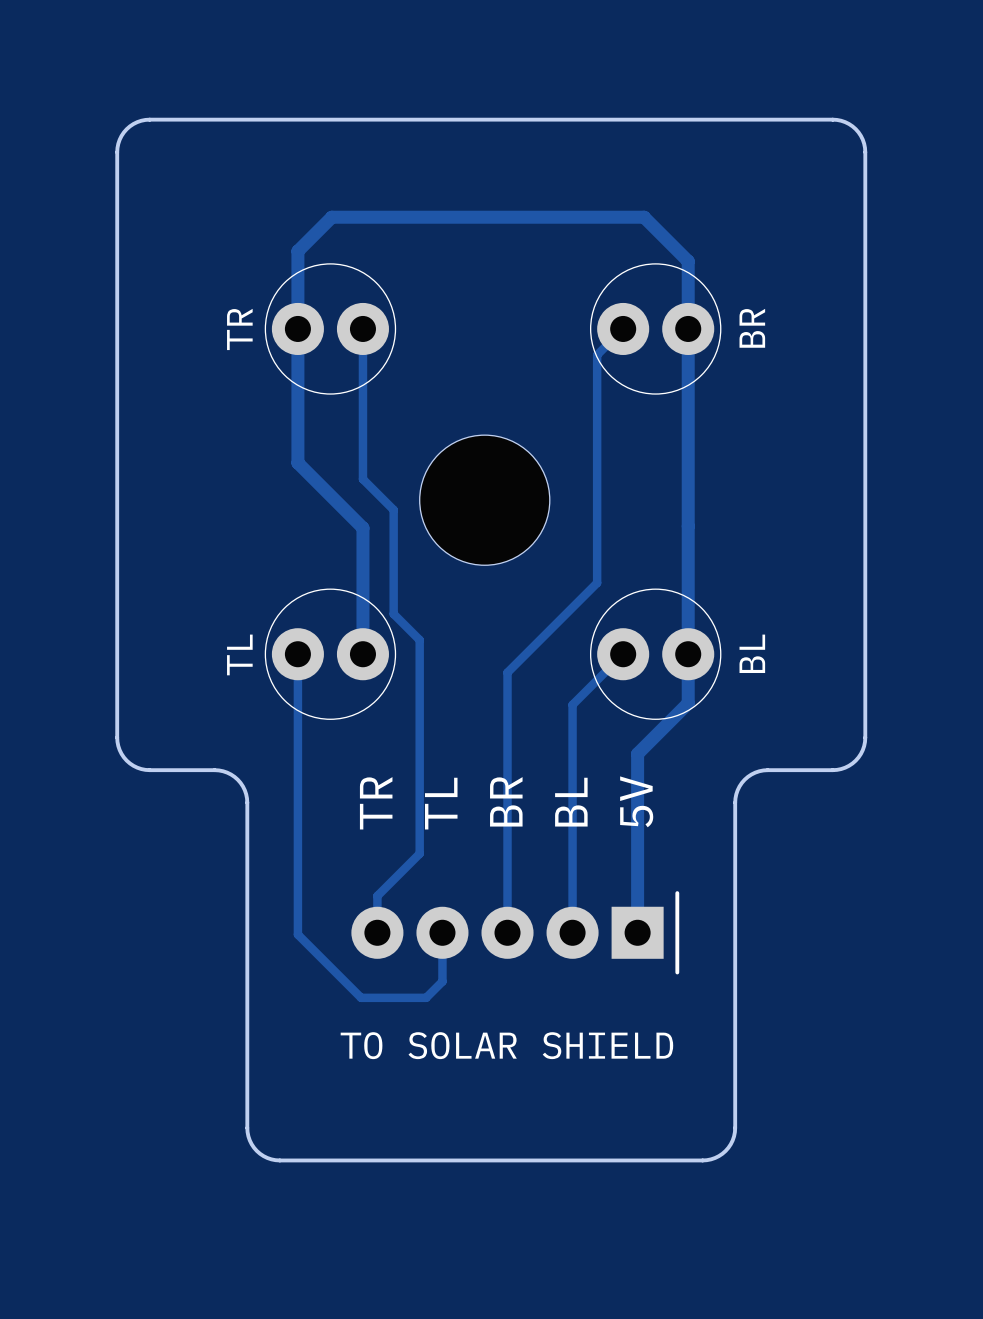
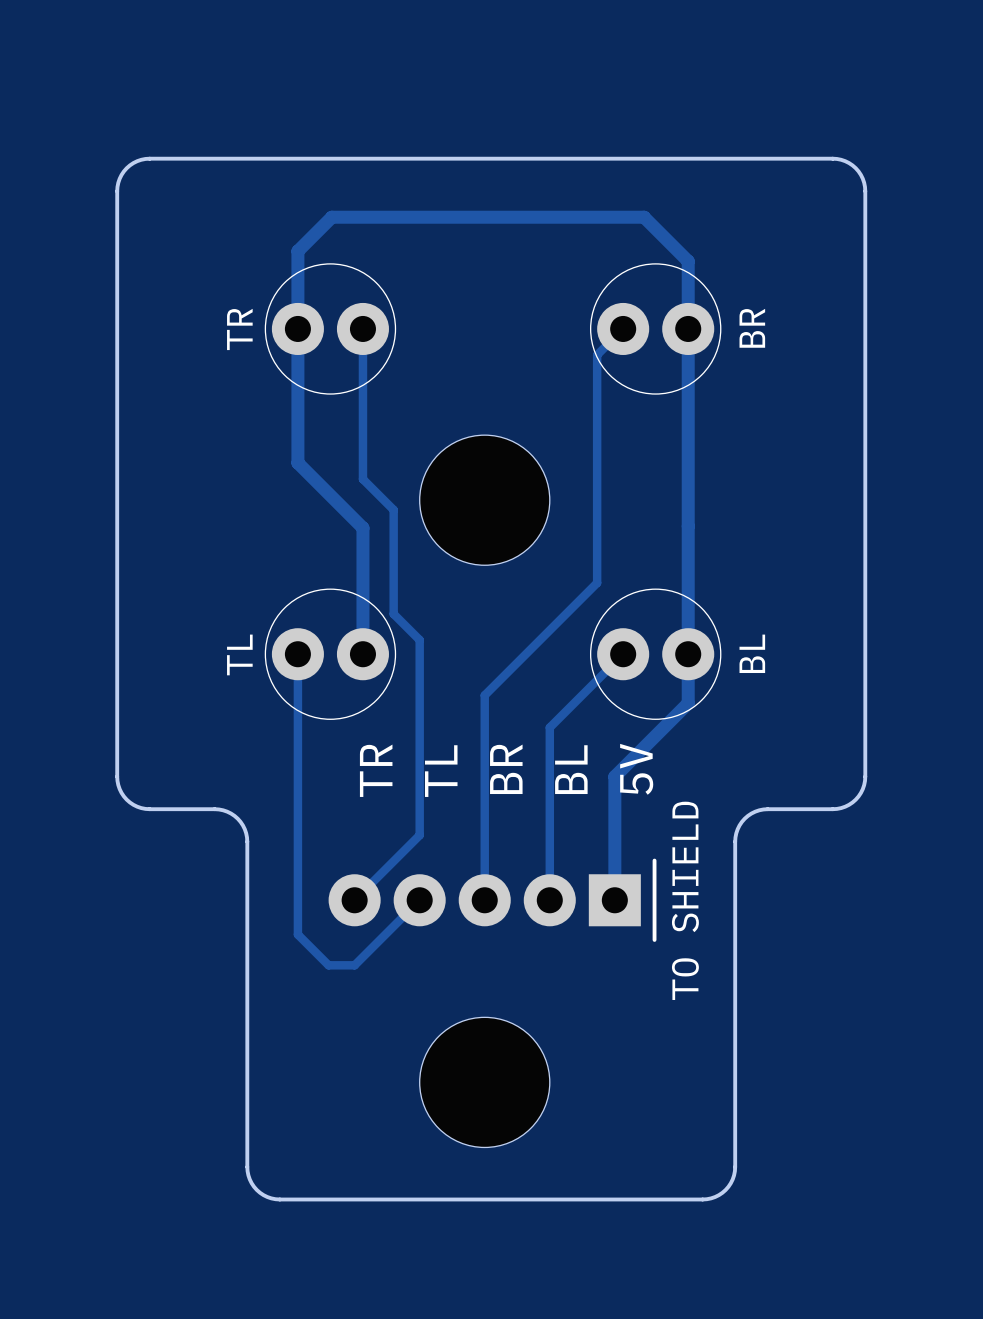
board edge: (117, 191) (117, 152) (119, 139) (129, 126) (141, 120) (149, 119) (837, 119) (852, 126) (862, 139) (865, 152) (865, 191) -> (117, 191) (119, 178) (126, 168) (137, 161) (149, 158) (832, 158) (845, 161) (855, 168) (862, 178) (865, 191)
track: (507, 672) (507, 932) -> (507, 672) (484, 695) (484, 900)
track: (572, 704) (572, 932) -> (572, 704) (549, 727) (549, 900)
board edge: (117, 737) (118, 746) (123, 757) (133, 765) (141, 769) (219, 770) (234, 776) (242, 786) (247, 798) (247, 841) -> (117, 737) (117, 780) (121, 792) (129, 802) (145, 808) (223, 810) (231, 813) (240, 821) (246, 833) (247, 841)
board edge: (865, 737) (862, 750) (858, 757) (849, 765) (841, 769) (763, 770) (747, 776) (739, 786) (735, 798) (735, 841) -> (865, 737) (865, 780) (860, 792) (852, 802) (837, 808) (759, 810) (751, 813) (741, 821) (736, 833) (735, 841)
track: (637, 753) (637, 932) -> (637, 753) (614, 776) (614, 900)
text position: BR (506, 801) -> BR (506, 769)
text position: 5V (636, 801) -> 5V (636, 769)
text position: BL (571, 802) -> BL (571, 769)
text position: TR (376, 803) -> TR (376, 770)
text position: TL (441, 803) -> TL (441, 771)
track: (419, 835) (419, 853) (377, 895) (377, 932) -> (419, 835) (354, 900)
part: none -> (492, 900)
track: (442, 932) (442, 981) (426, 997) (361, 997) (328, 965) -> (419, 900) (354, 965) (328, 965)
part: (515, 932) -> none
part: none -> (484, 1082)
board edge: (247, 1127) (249, 1140) (256, 1150) (267, 1157) (279, 1160) (706, 1160) (718, 1156) (725, 1150) (732, 1140) (735, 1127) -> (247, 1127) (247, 1166) (249, 1179) (254, 1186) (263, 1195) (279, 1199) (706, 1199) (722, 1192) (732, 1179) (735, 1166) (735, 1127)

